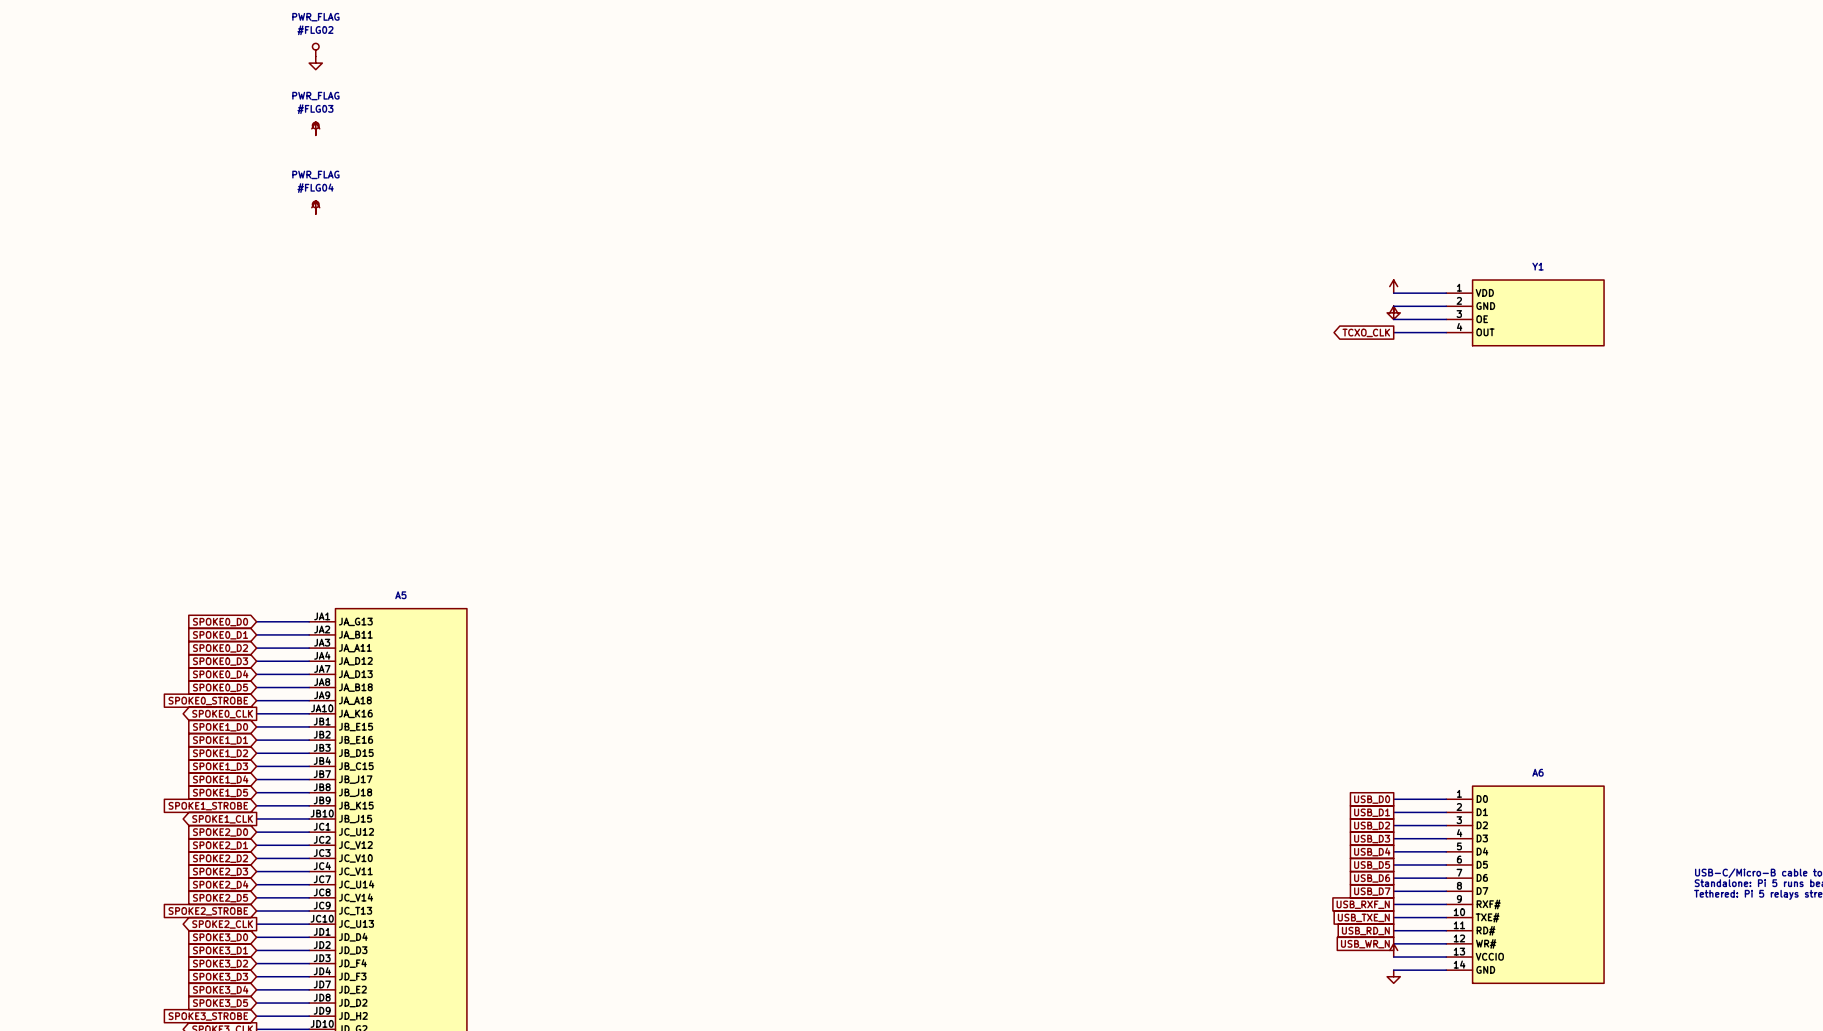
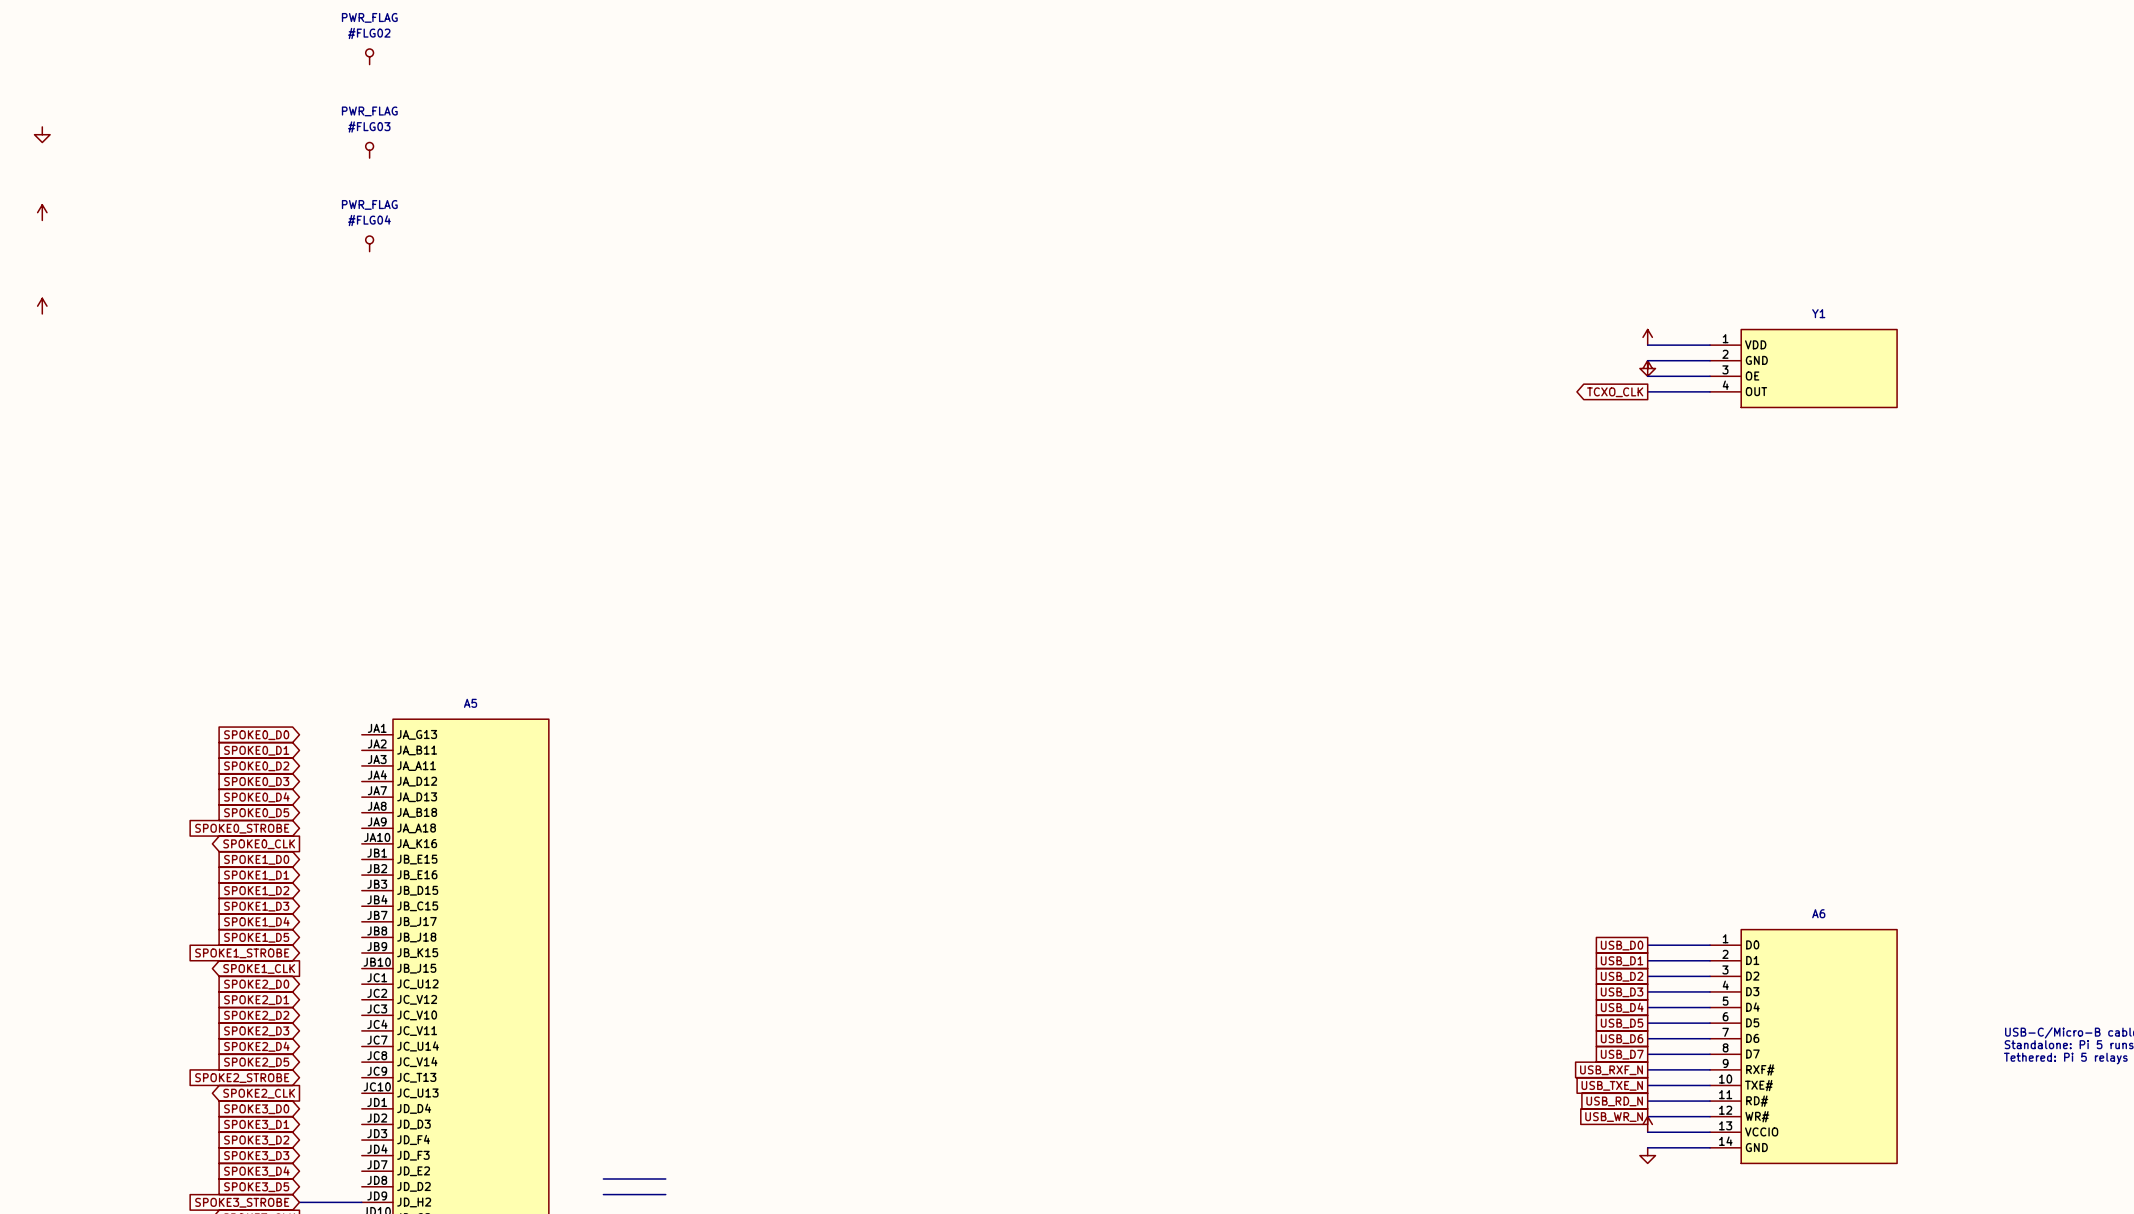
power symbol: (315, 63) -> none
power symbol: none -> (42, 134)
power symbol: (315, 128) -> none
power symbol: none -> (42, 212)
power symbol: (315, 207) -> none
power symbol: none -> (42, 306)
wire: (256, 621) (309, 621) -> none
wire: (256, 634) (309, 634) -> none
wire: (256, 648) (309, 648) -> none
wire: (256, 661) (309, 661) -> none
wire: (256, 674) (309, 674) -> none
wire: (256, 687) (309, 687) -> none
wire: (256, 700) (309, 700) -> none
wire: (256, 713) (309, 713) -> none
wire: (256, 726) (309, 726) -> none
wire: (256, 740) (309, 740) -> none
wire: (256, 753) (309, 753) -> none
wire: (256, 766) (309, 766) -> none
wire: (256, 779) (309, 779) -> none
wire: (256, 792) (309, 792) -> none
wire: (256, 805) (309, 805) -> none
wire: (256, 818) (309, 818) -> none
wire: (256, 832) (309, 832) -> none
wire: (256, 845) (309, 845) -> none
wire: (256, 858) (309, 858) -> none
wire: (256, 871) (309, 871) -> none
wire: (256, 884) (309, 884) -> none
wire: (256, 897) (309, 897) -> none
wire: (256, 911) (309, 911) -> none
wire: (256, 924) (309, 924) -> none
wire: (256, 937) (309, 937) -> none
wire: (256, 950) (309, 950) -> none
wire: (256, 963) (309, 963) -> none
wire: (256, 976) (309, 976) -> none
wire: (256, 989) (309, 989) -> none
wire: none -> (603, 1178) (665, 1178)
wire: (256, 1003) (309, 1003) -> none
wire: none -> (603, 1194) (665, 1194)

